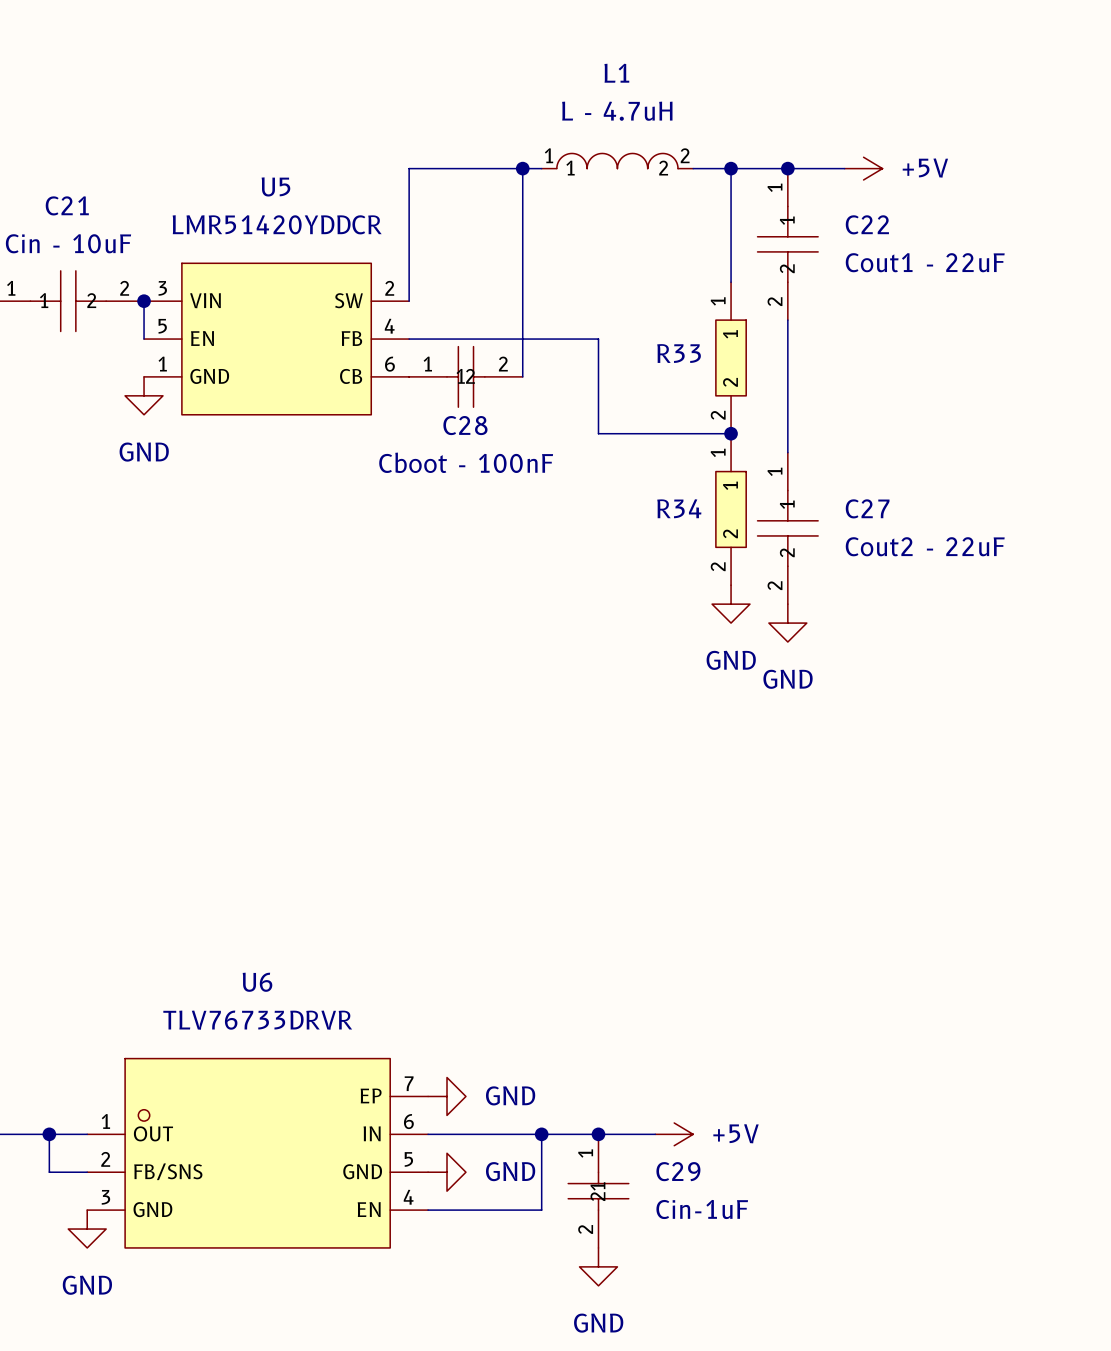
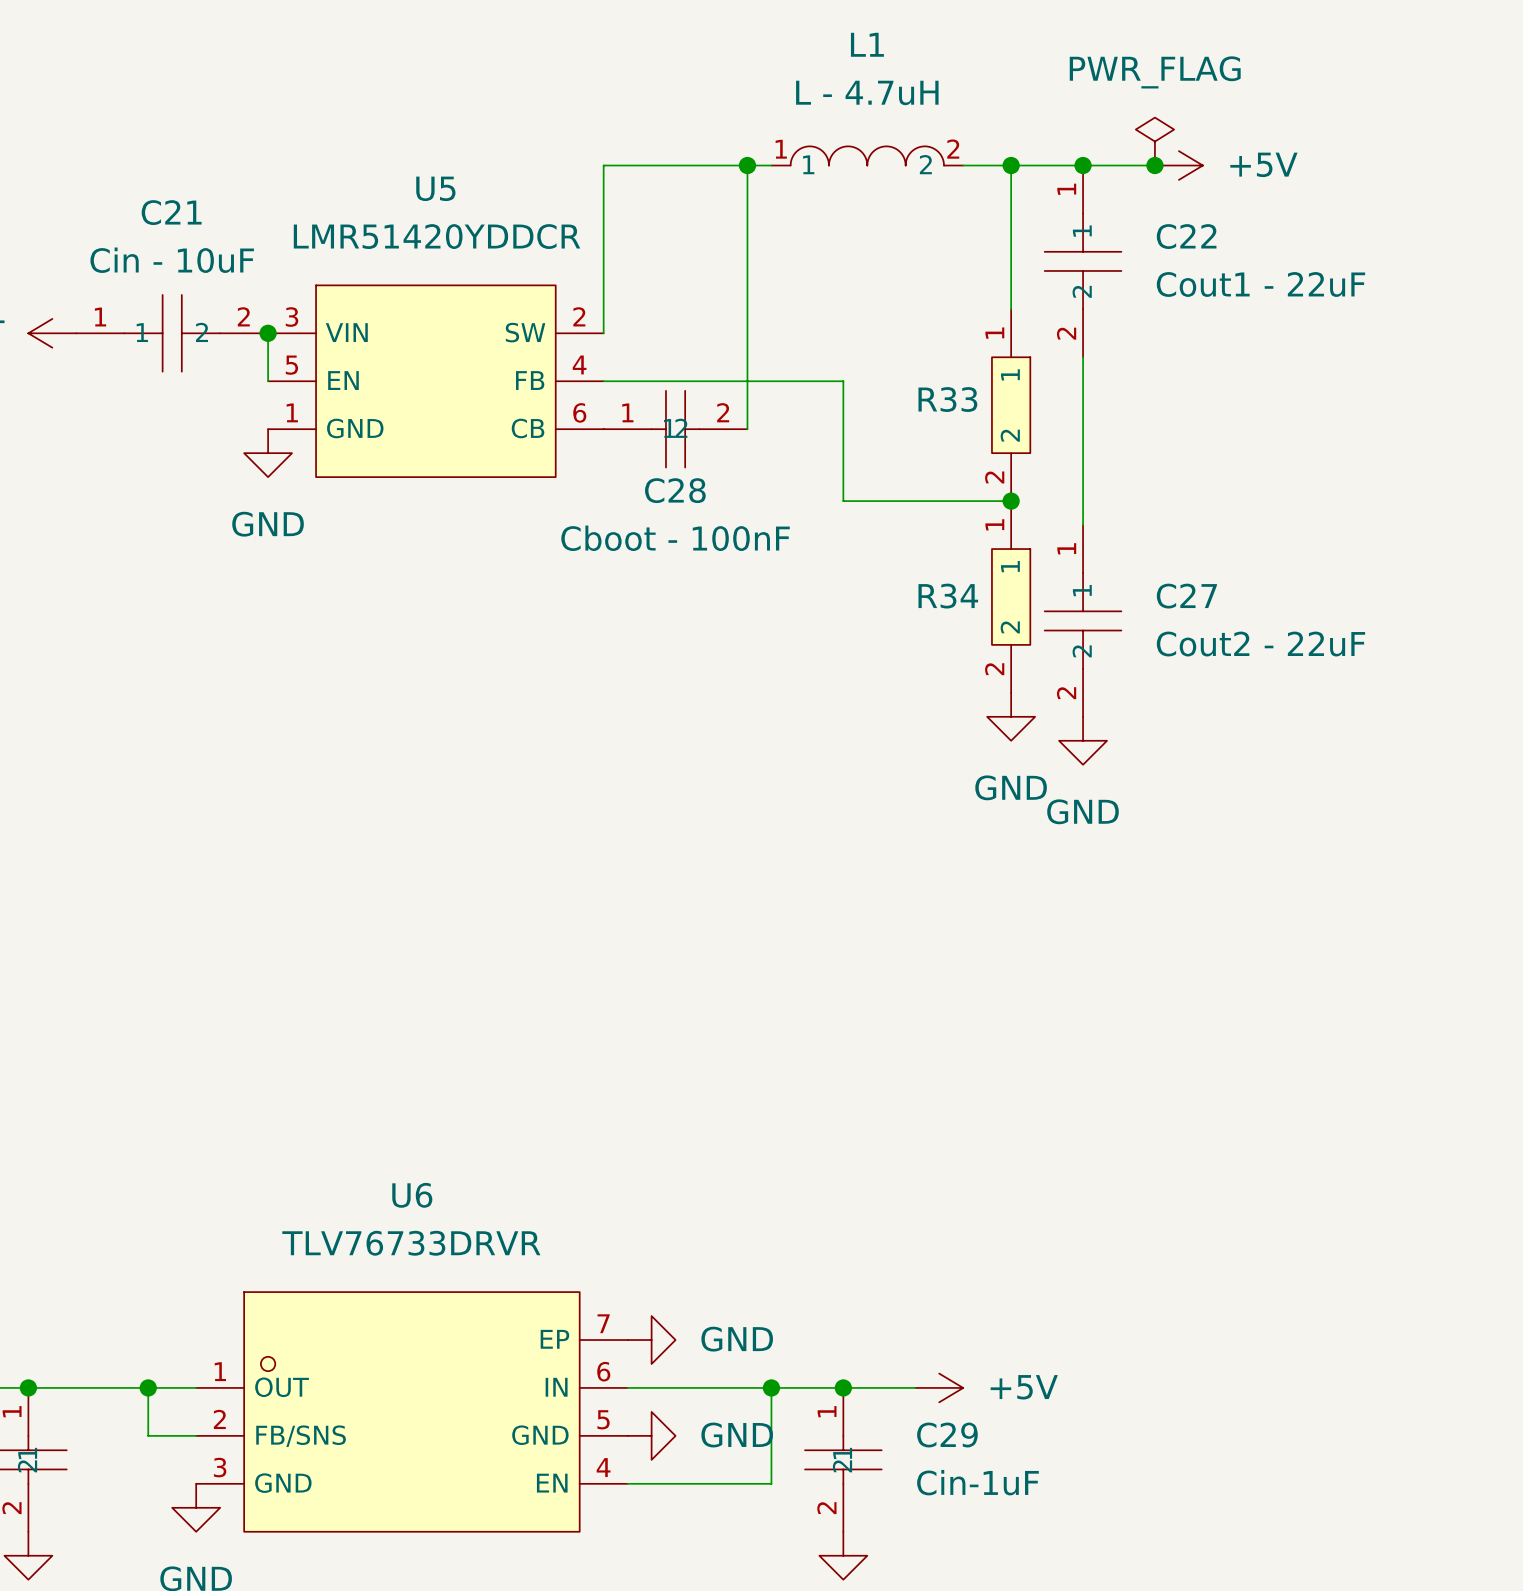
power symbol: none -> PWR_FLAG (1154, 141)
junction: none -> (1154, 165)

